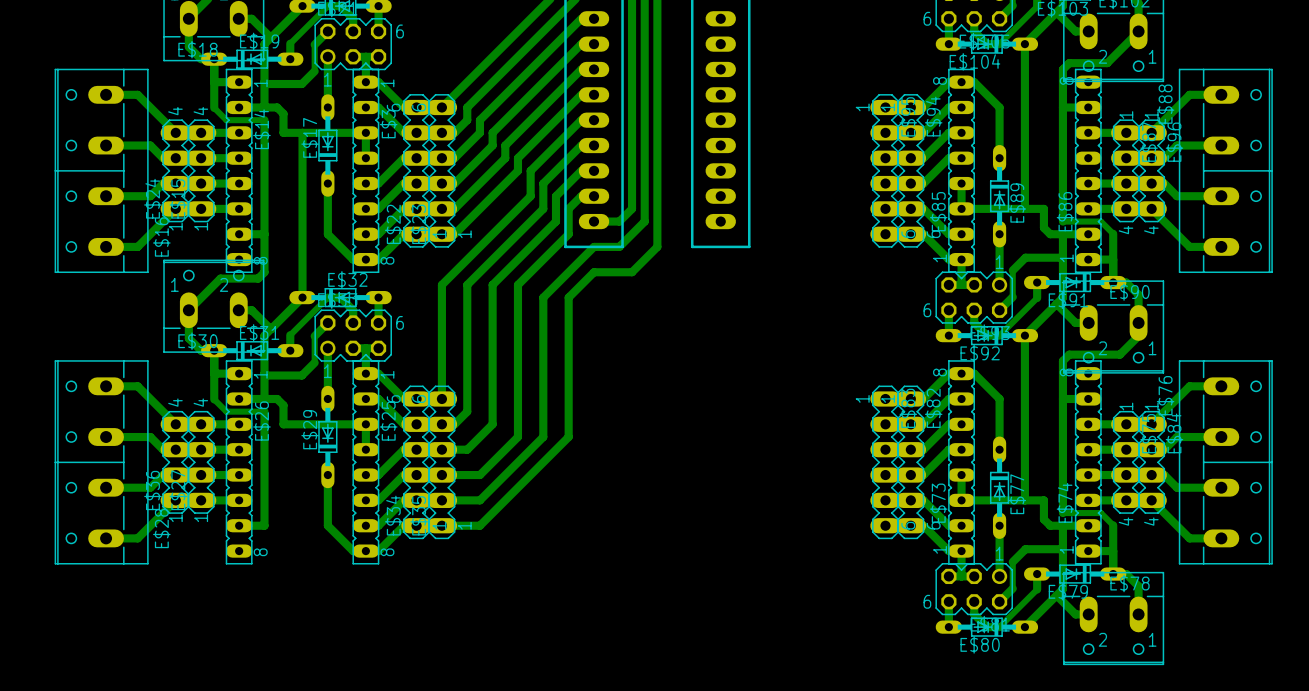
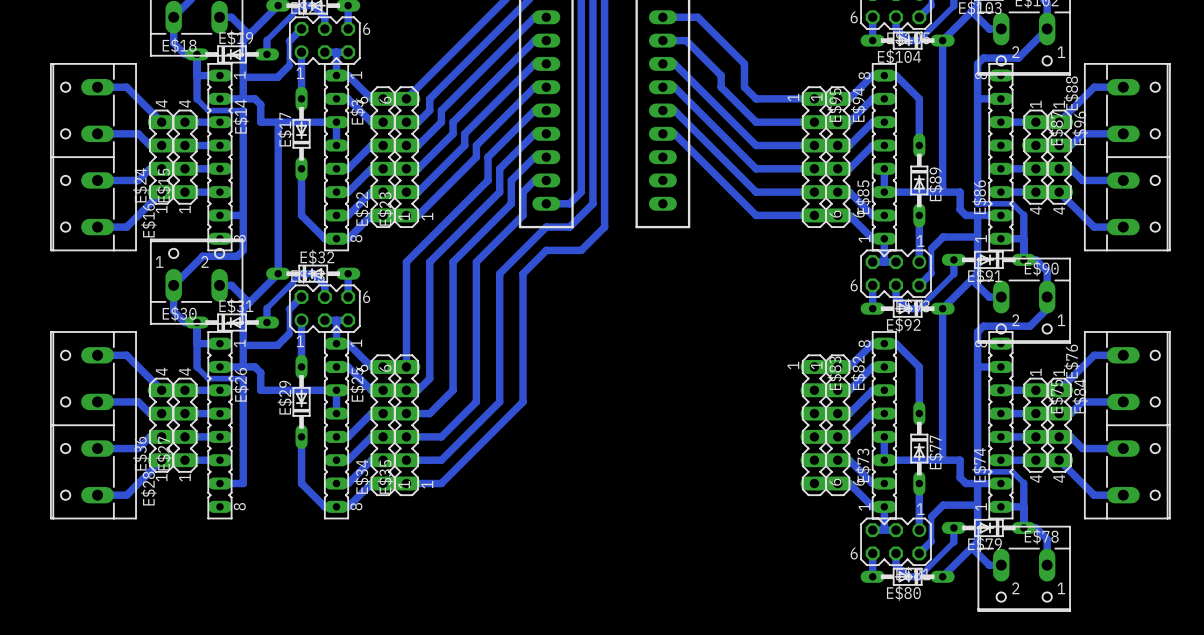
bottom track: none -> (662, 17) (697, 17) (744, 63) (744, 87) (756, 98) (814, 98)
bottom track: none -> (662, 40) (686, 40) (721, 75) (721, 87) (756, 122) (814, 122)
bottom track: none -> (662, 63) (674, 63) (756, 145) (814, 145)
bottom track: none -> (662, 87) (674, 87) (756, 168) (814, 168)
bottom track: none -> (662, 110) (674, 110) (756, 192) (814, 192)
bottom track: none -> (662, 133) (674, 133) (756, 215) (814, 215)

